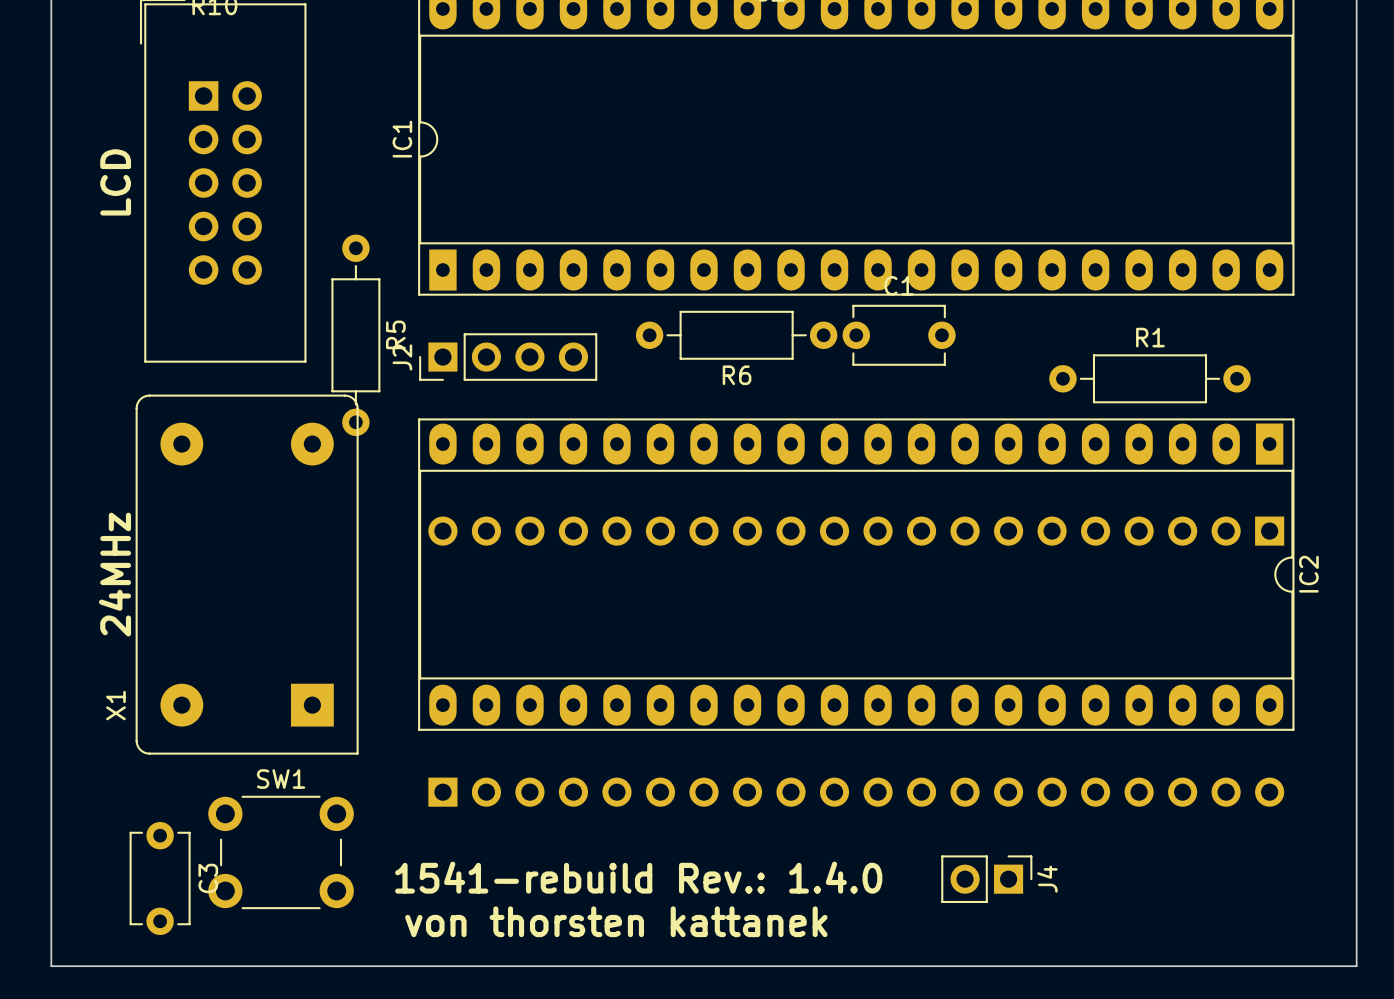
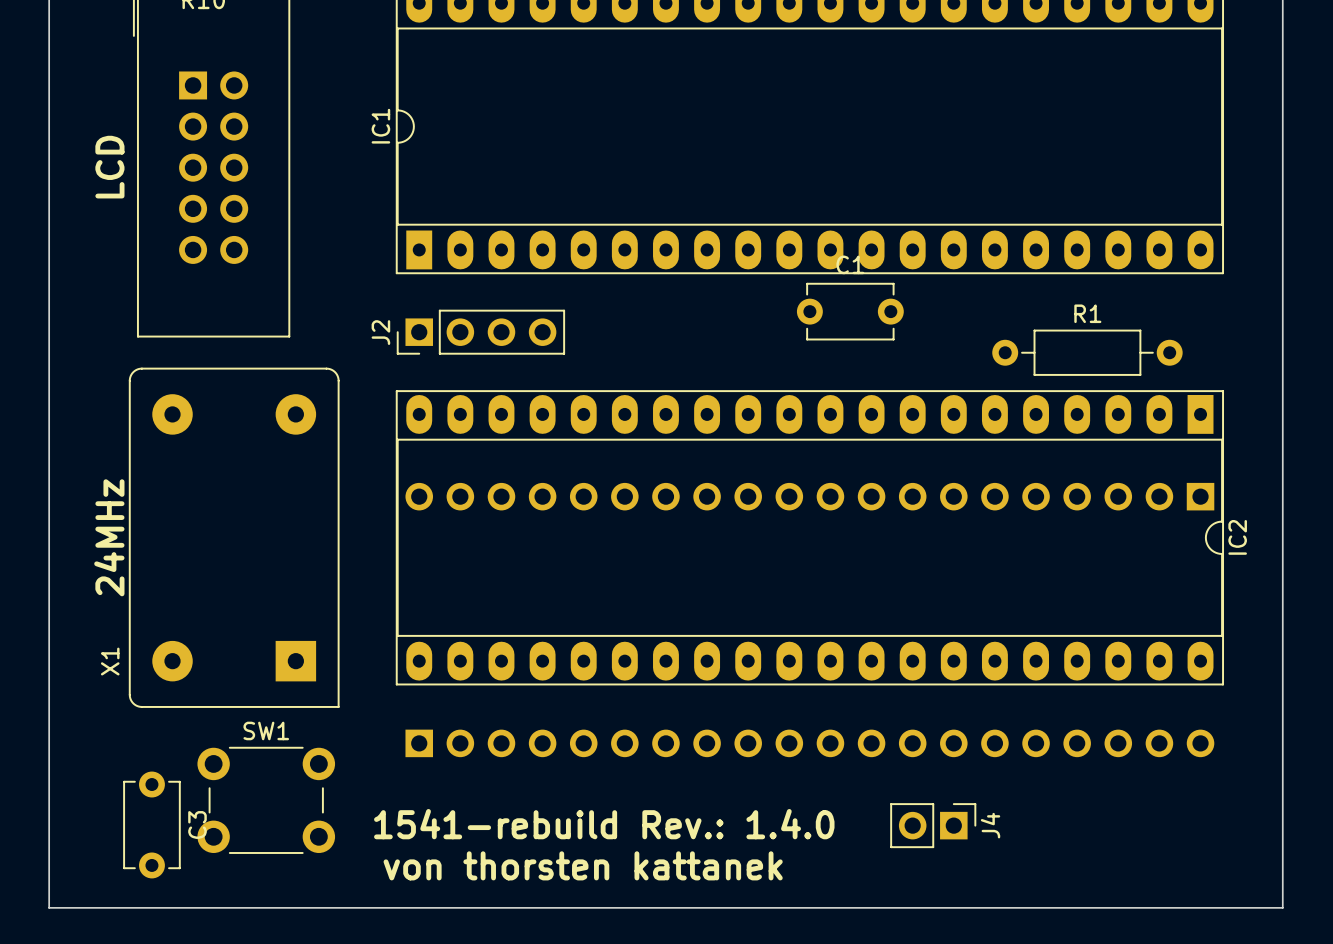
R5: (355, 335) -> none
R6: (736, 335) -> none

